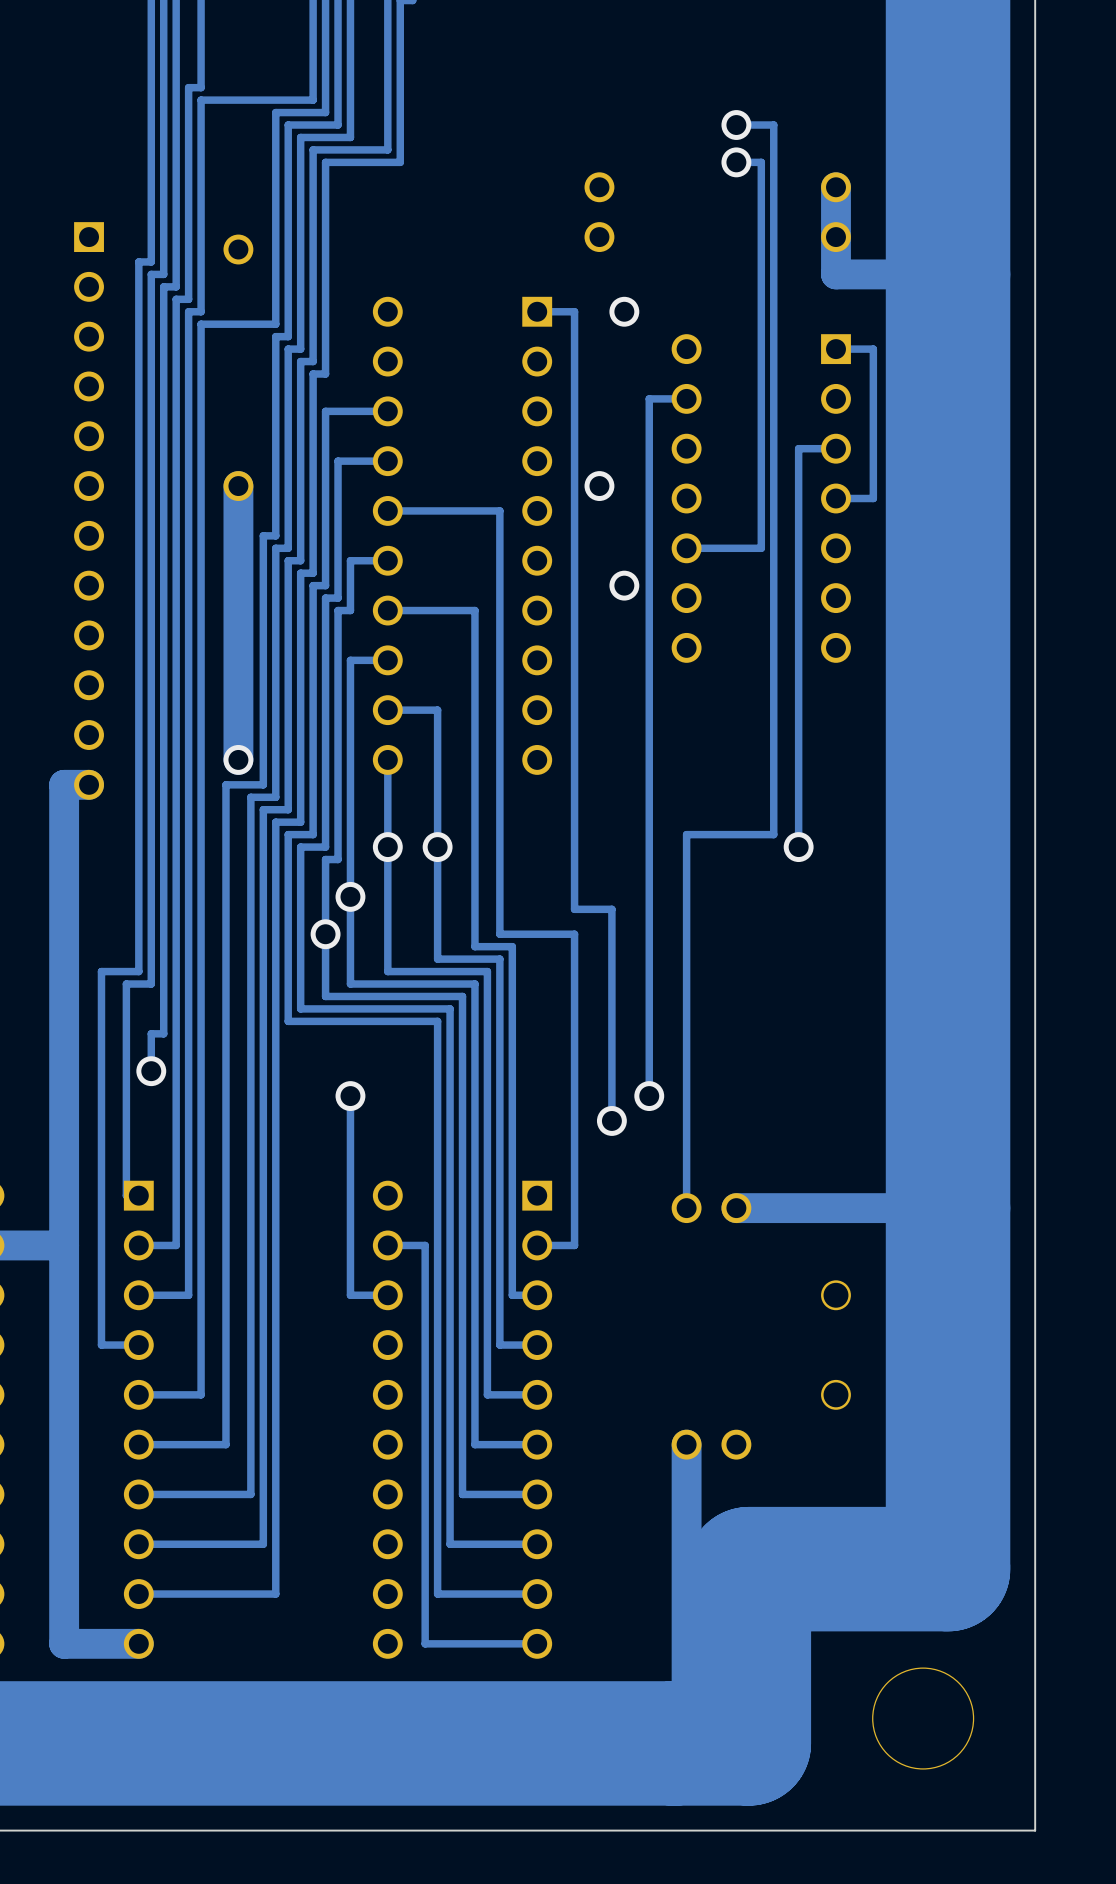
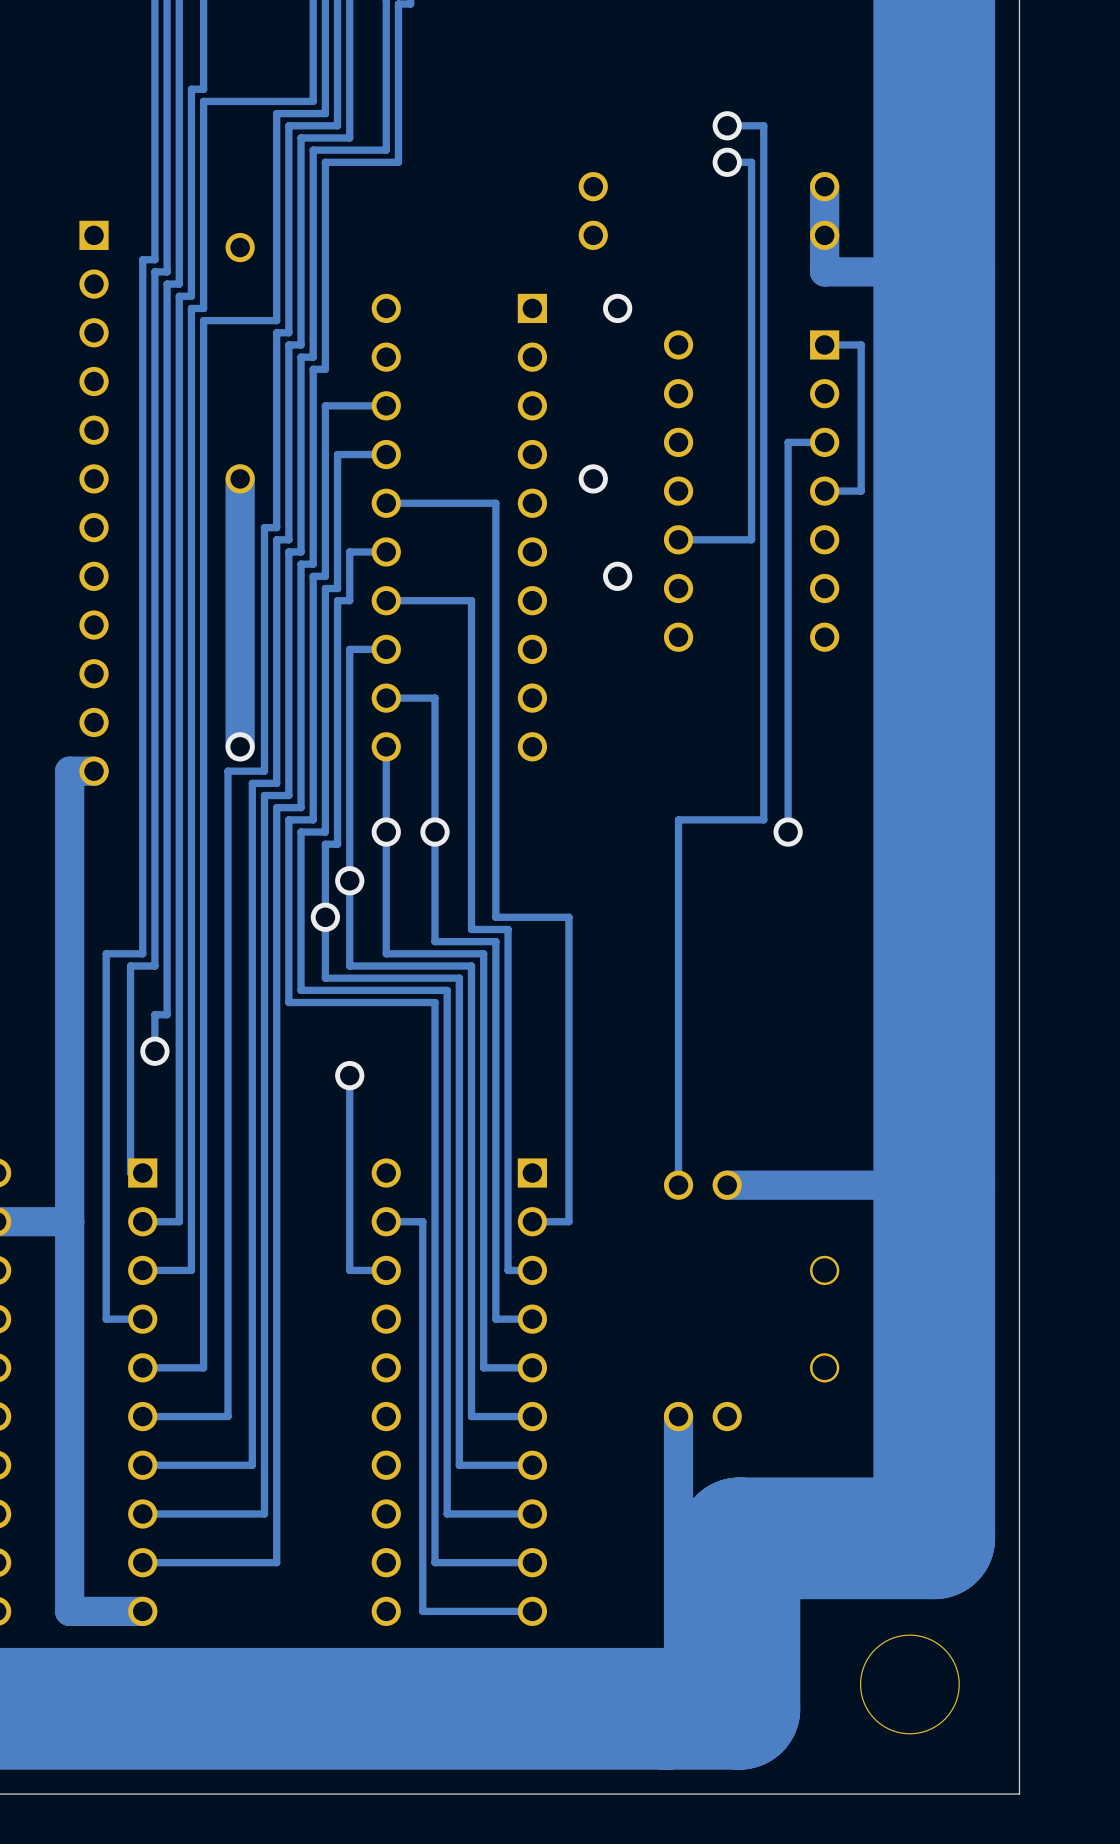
track: (537, 311) (574, 311) (574, 909) (611, 909) (611, 1120) -> none
track: (686, 398) (649, 398) (649, 1096) -> none
via: (649, 1096) -> none
via: (611, 1120) -> none

